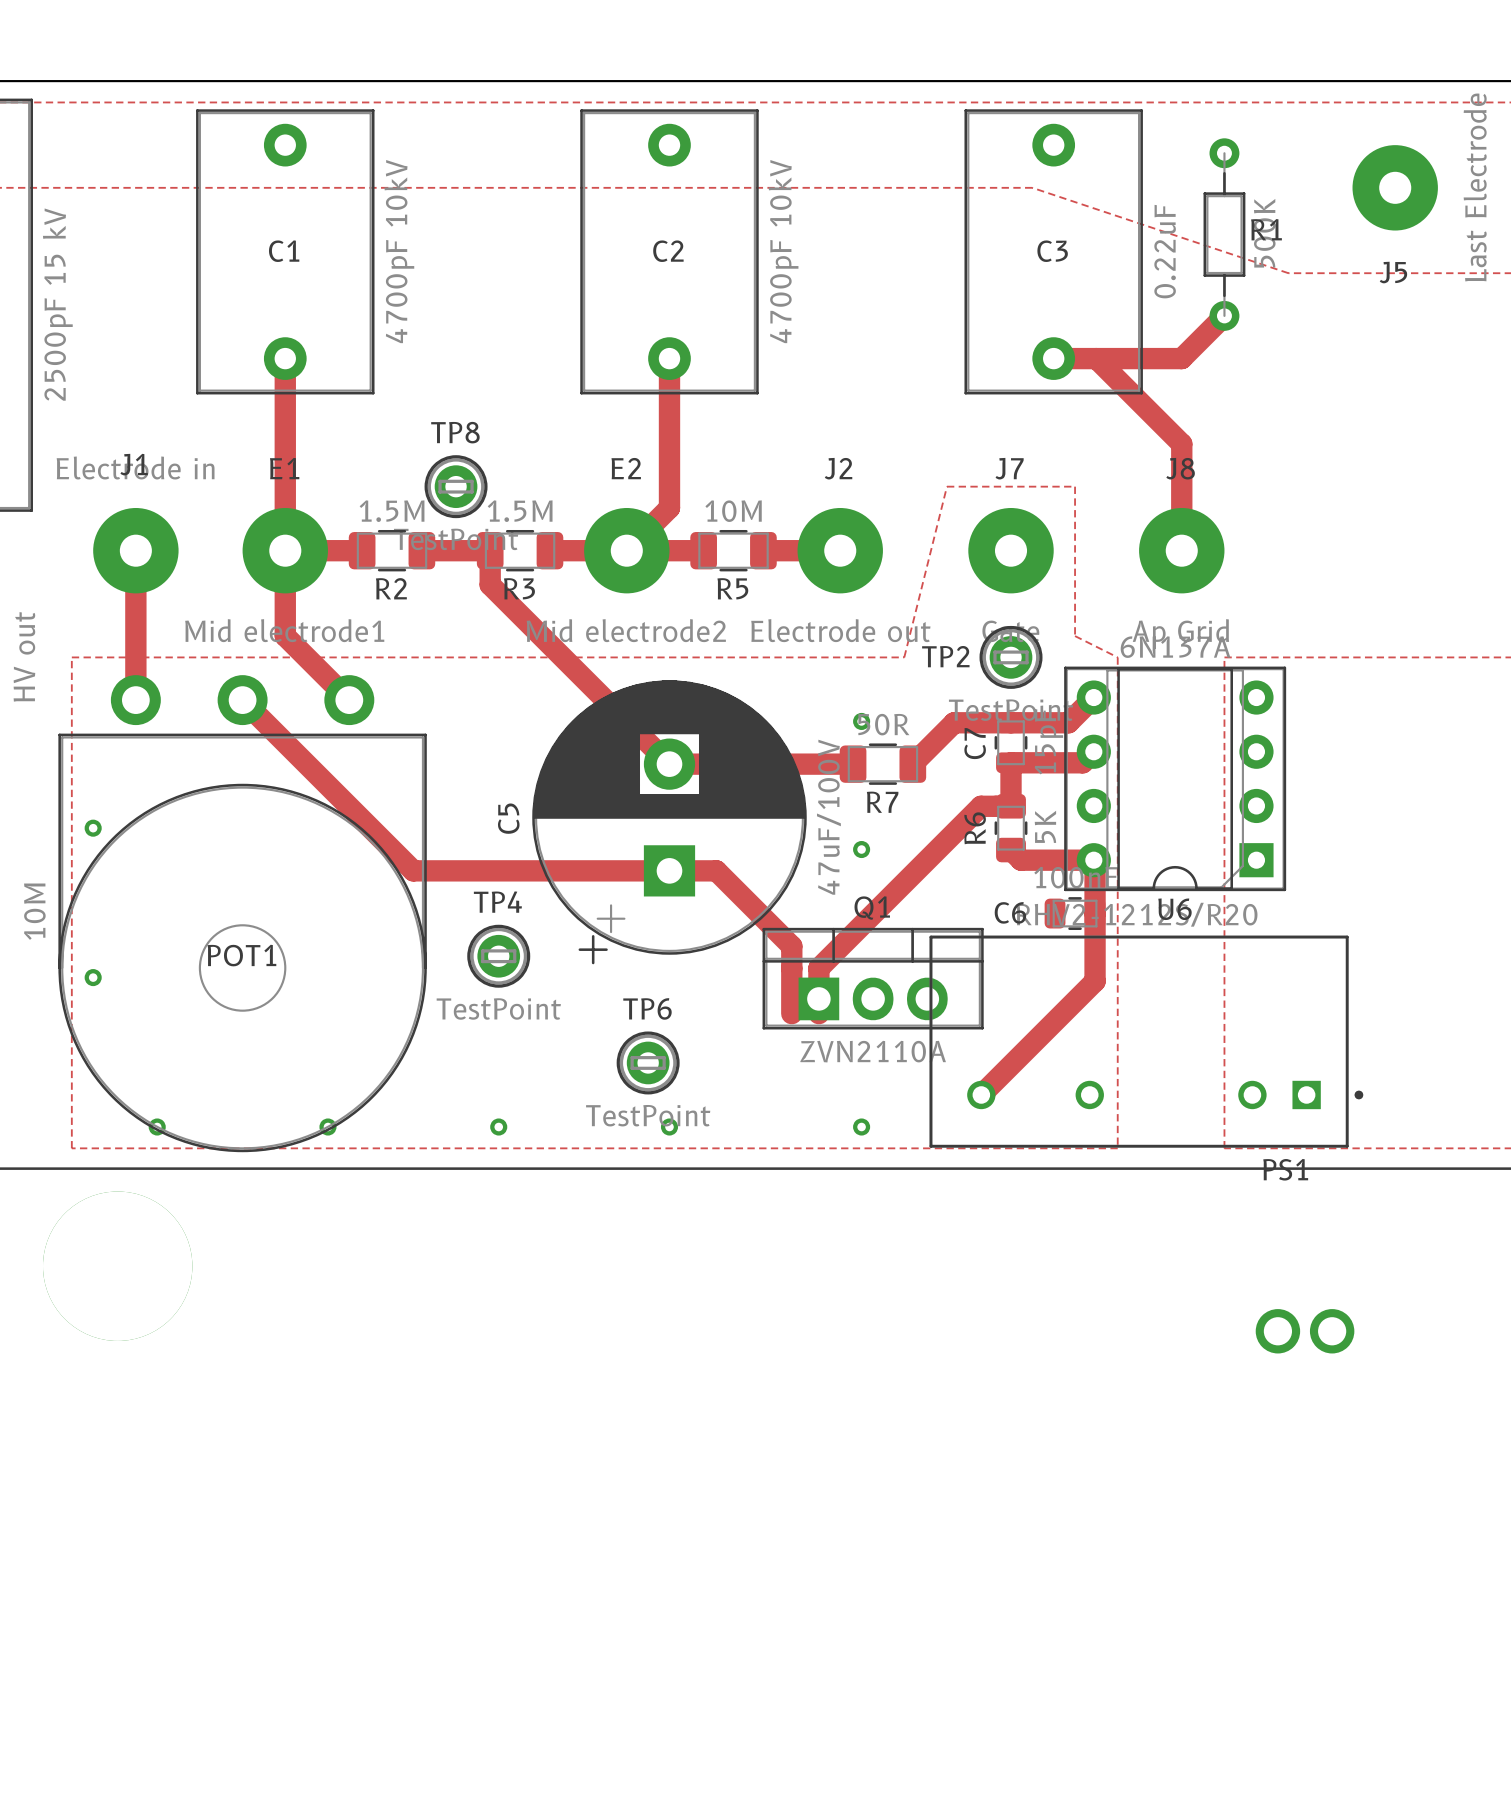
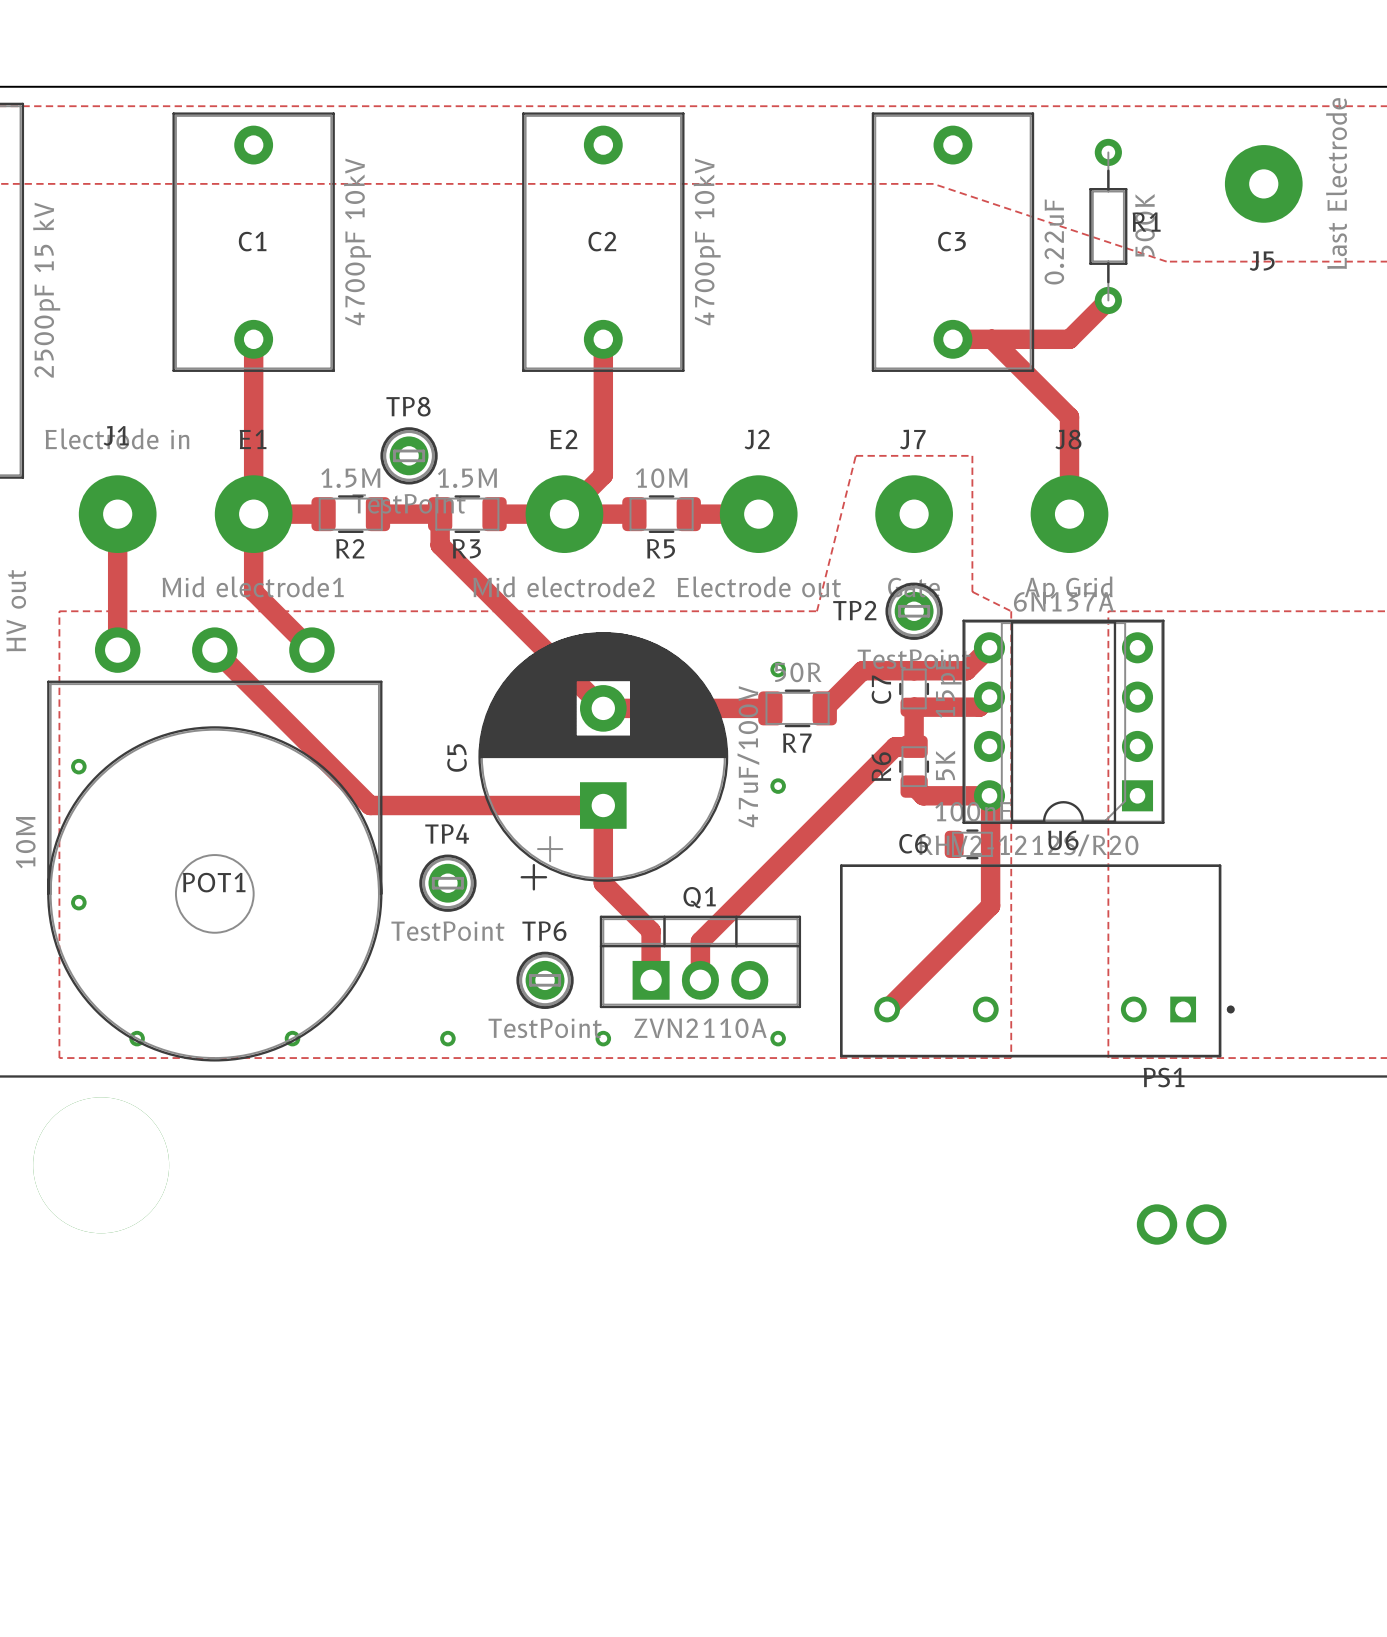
track: (990, 806) (981, 806) (818, 968) (818, 1013) -> (895, 746) (700, 941) (700, 980)
track: (669, 870) (716, 870) (791, 946) (791, 1013) -> (603, 805) (603, 883) (651, 931) (651, 980)
Q1 position: (873, 978) -> (700, 961)
TP6 position: (648, 1062) -> (545, 980)

